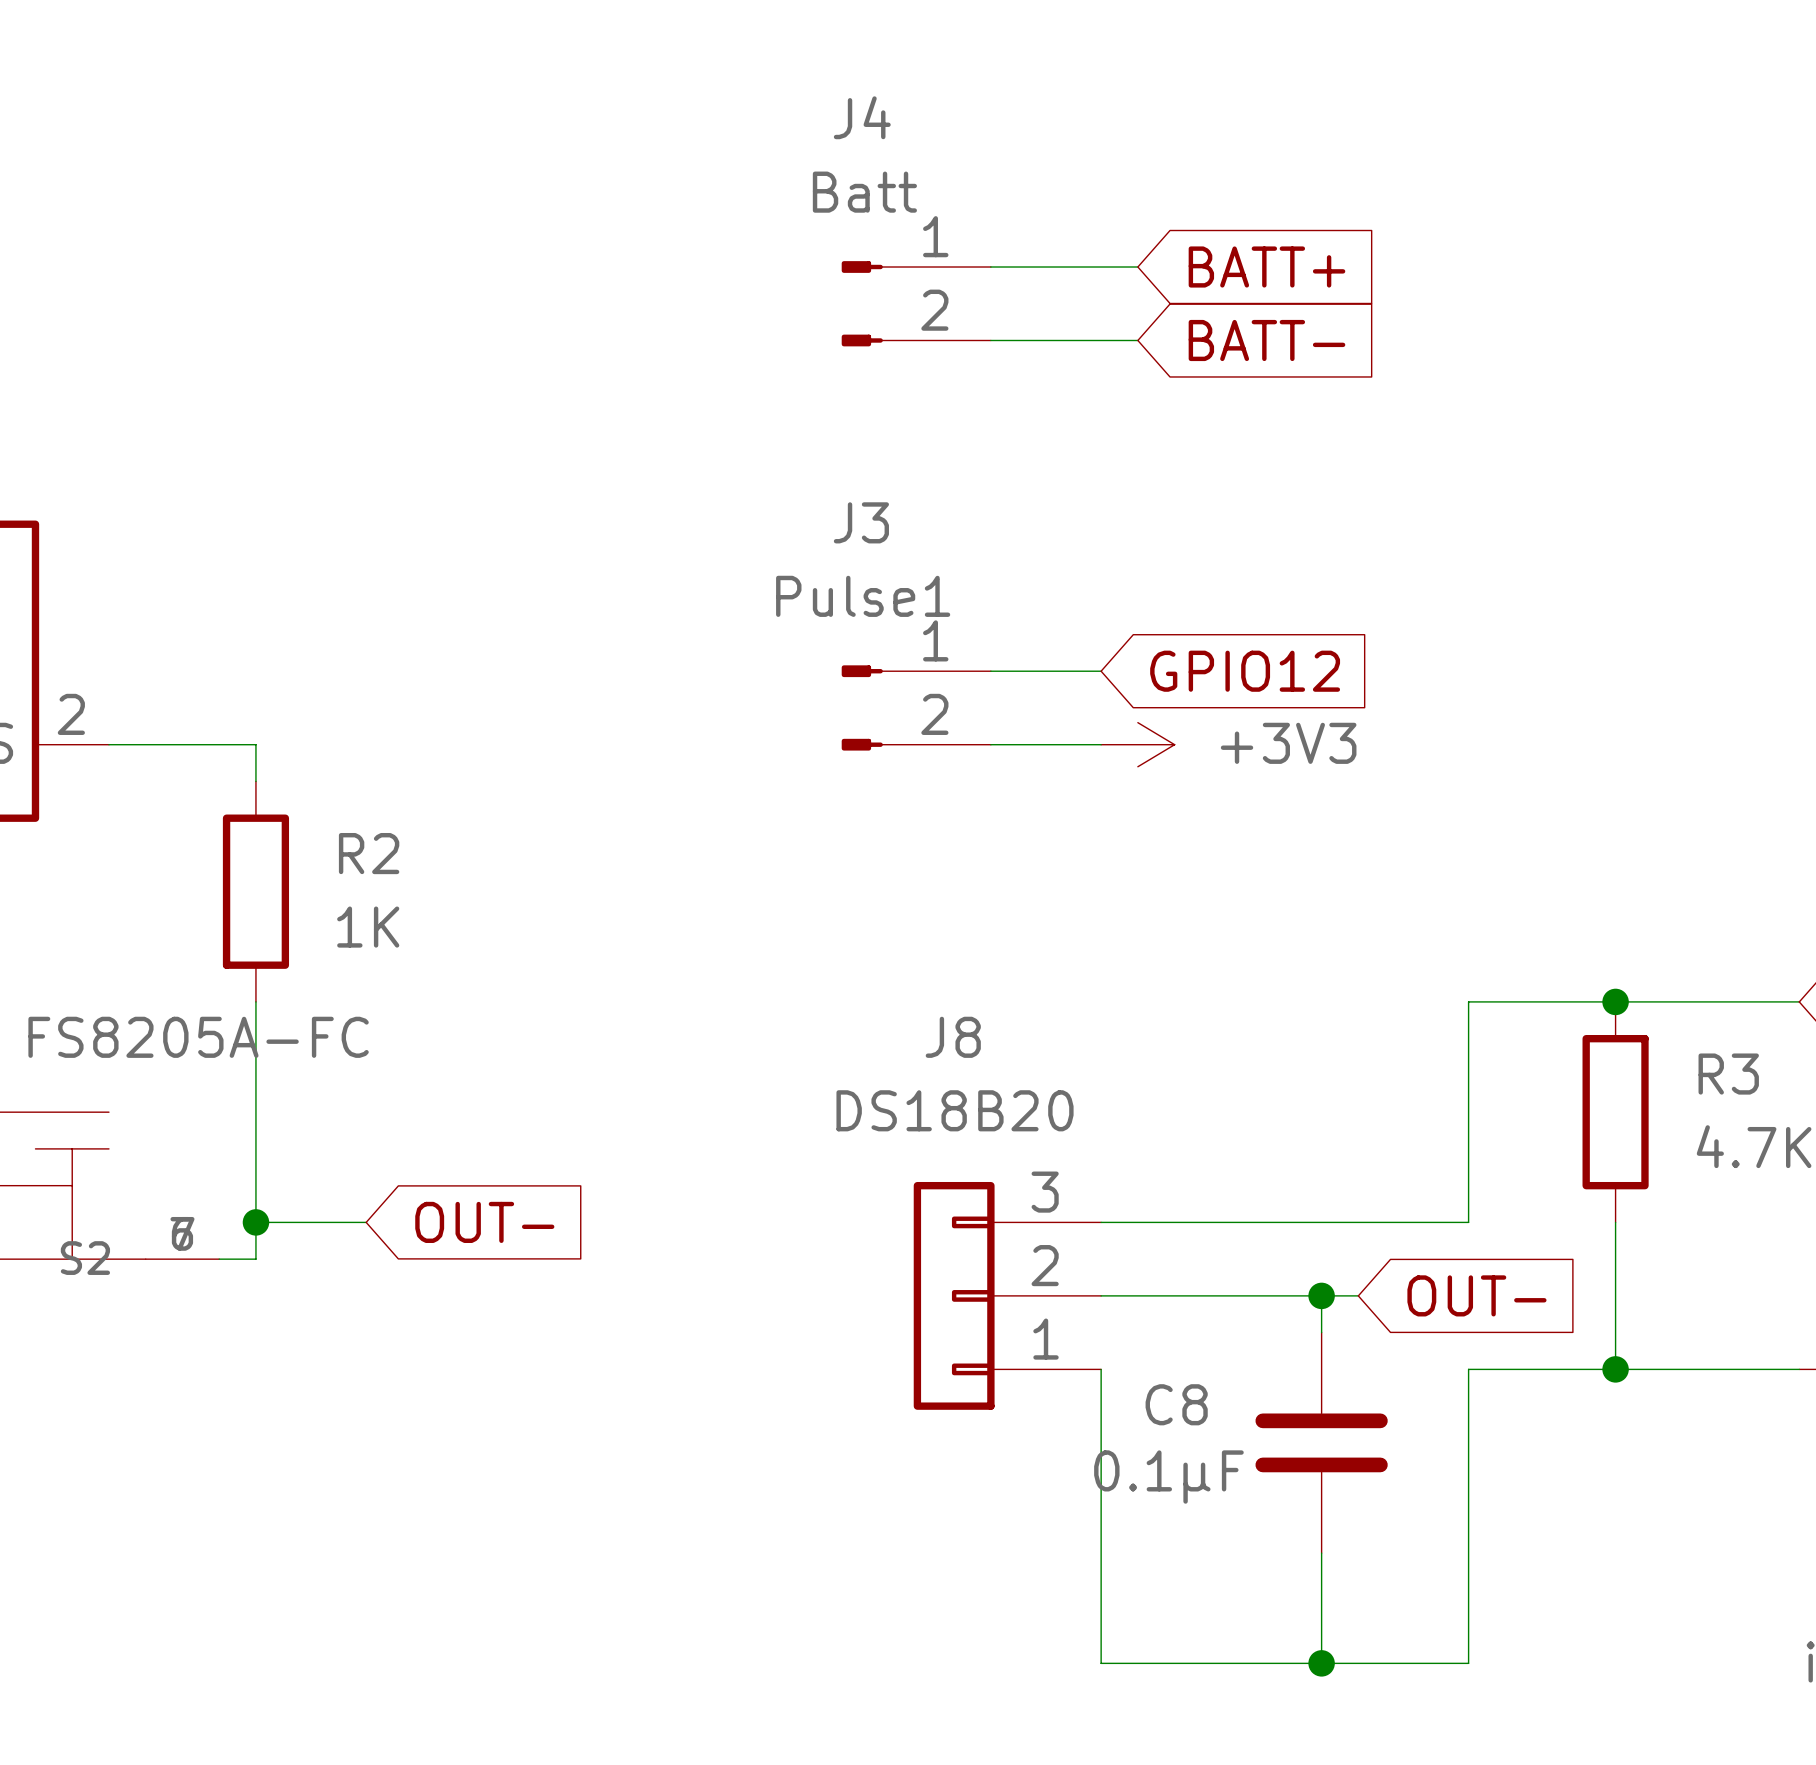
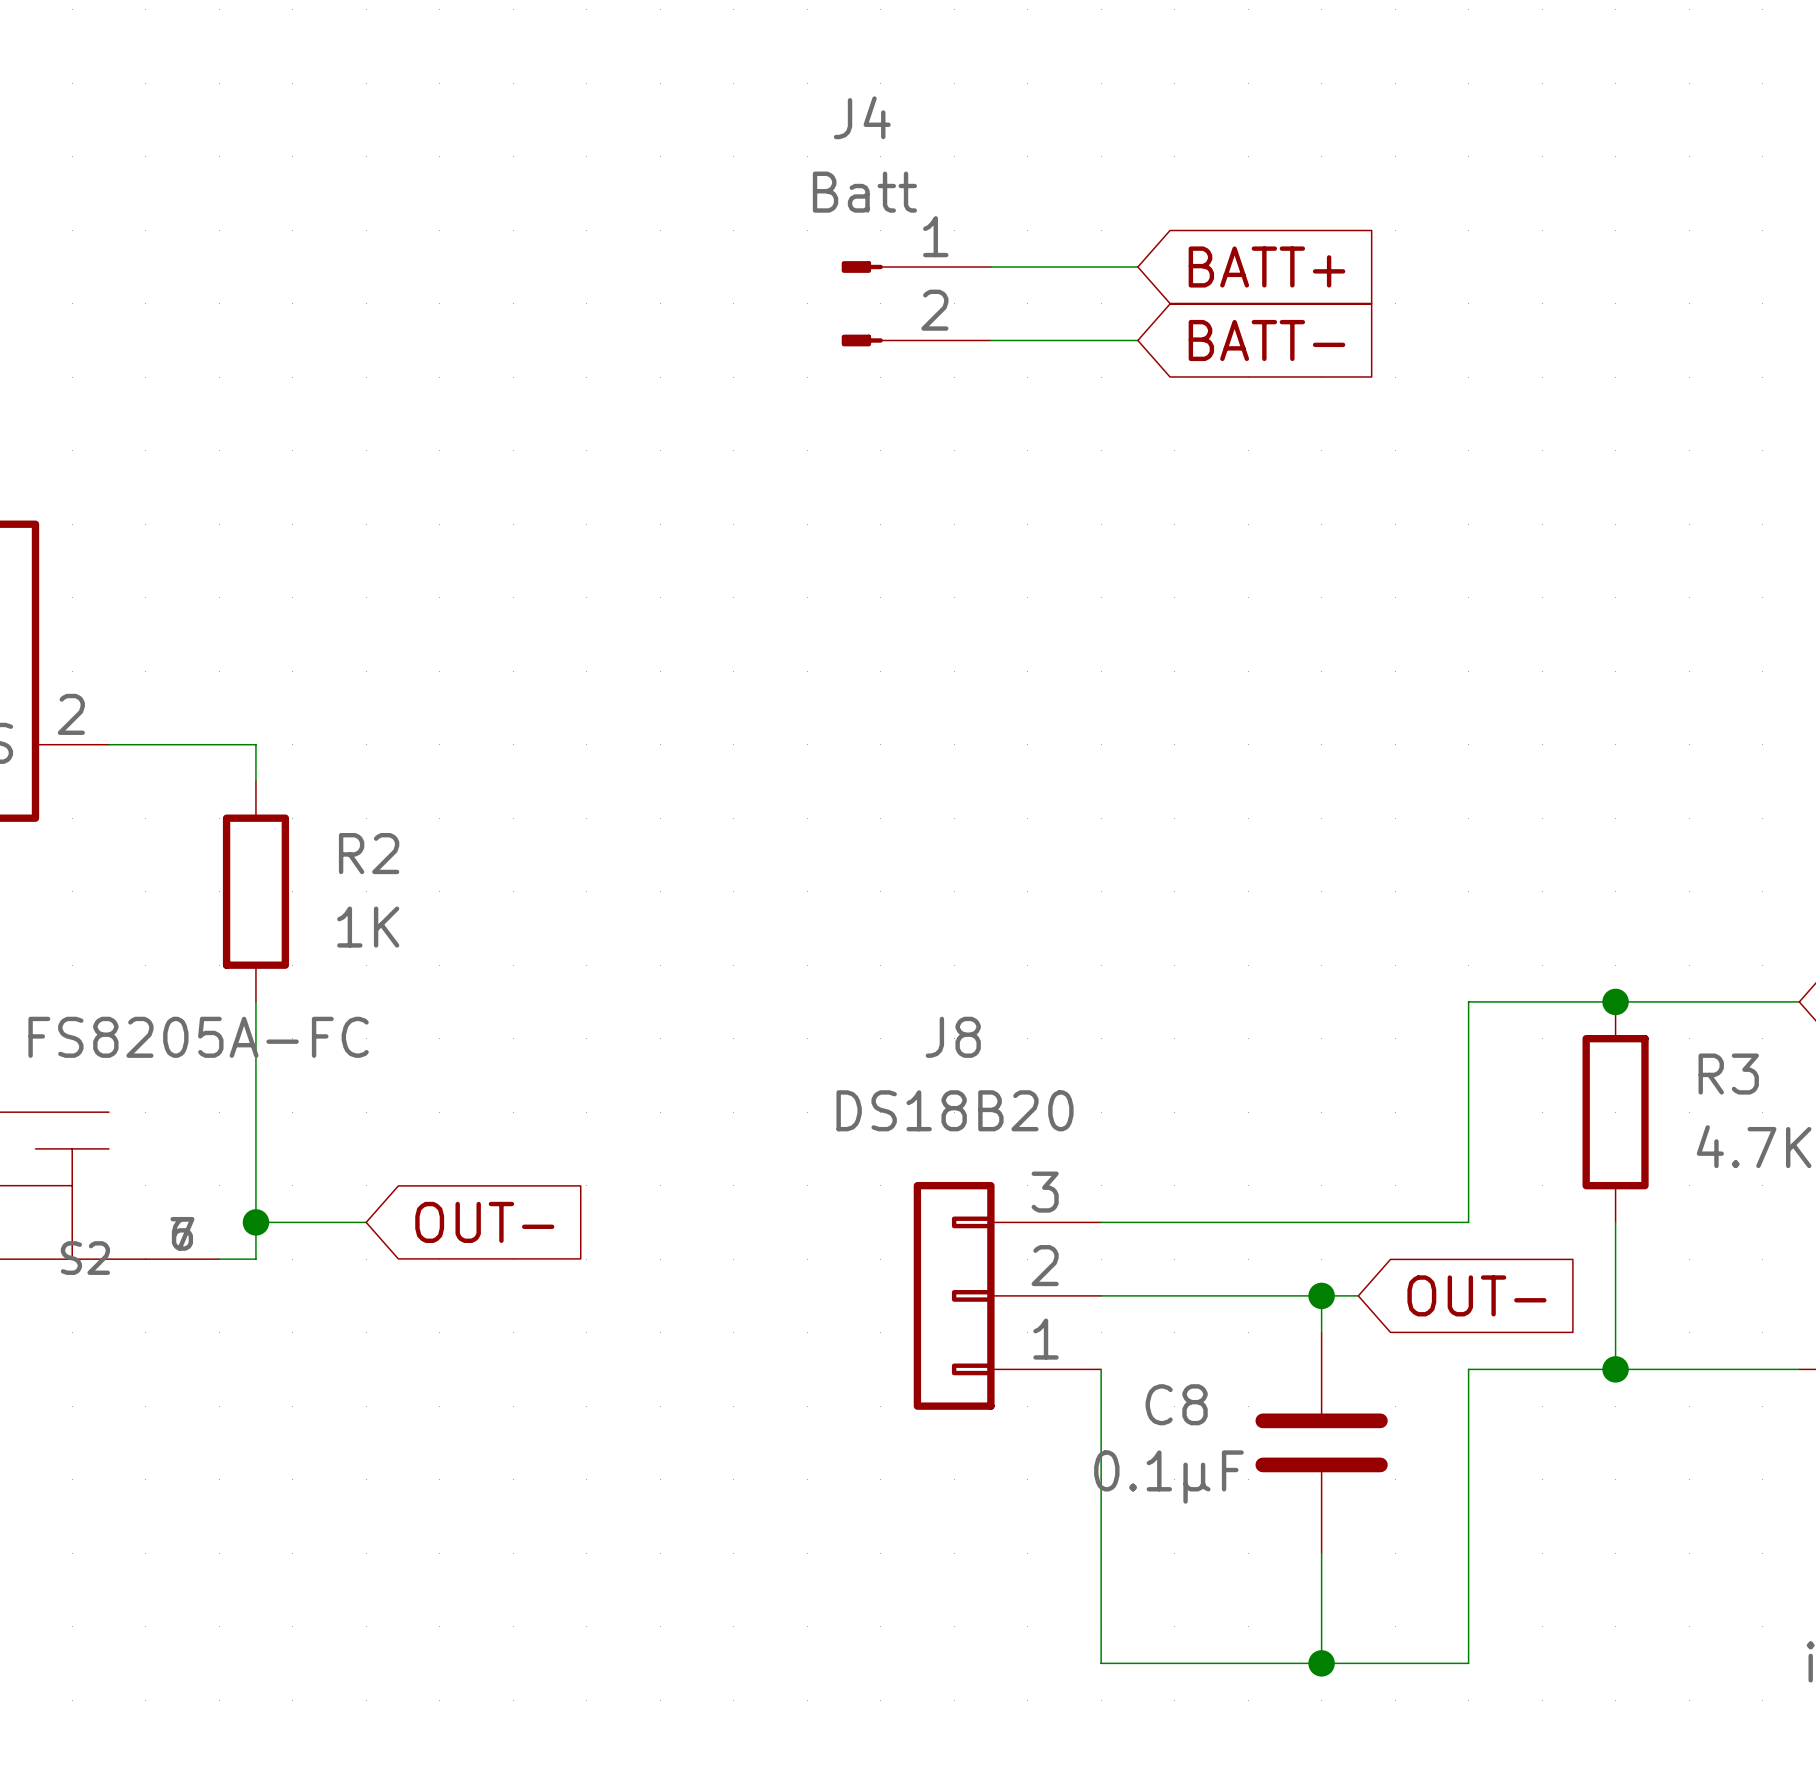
wire: (990, 671) (1101, 671) -> none
global label: GPIO12 (1245, 671) -> none
J3: Pulse1 (916, 707) -> none
wire: (990, 744) (1101, 744) -> none
power symbol: +3V3 (1137, 744) -> none

